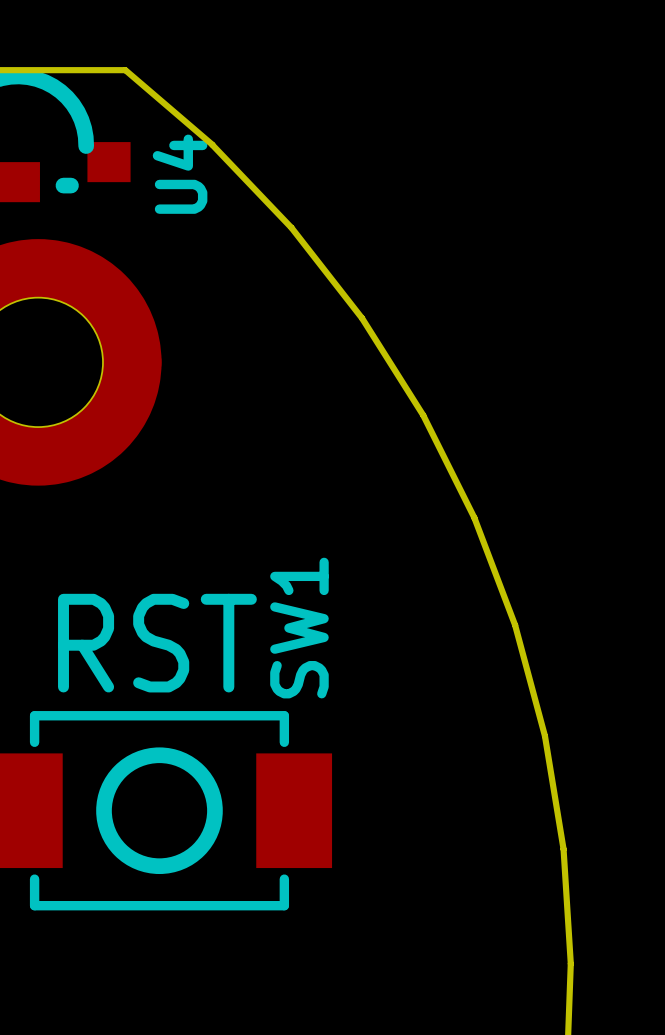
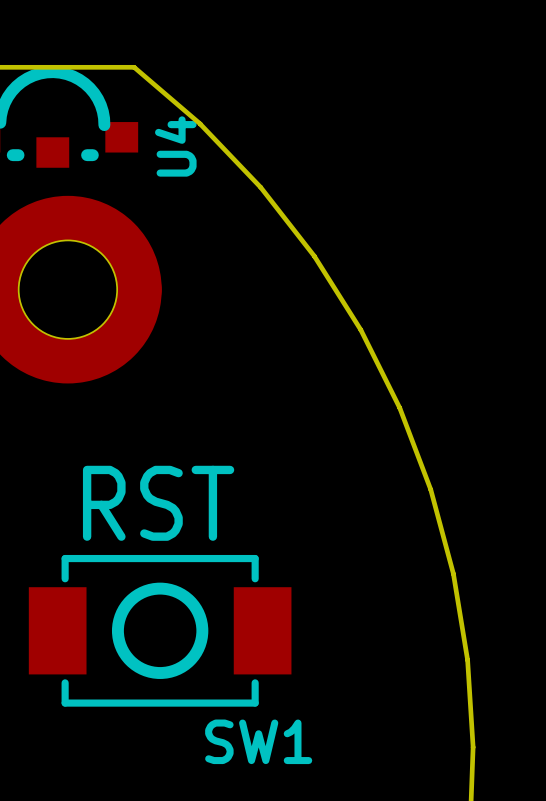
SW1 name rotation: 0° (299, 628) -> 90° clockwise (258, 741)
SW1 name position: SW1 (299, 628) -> SW1 (258, 741)

